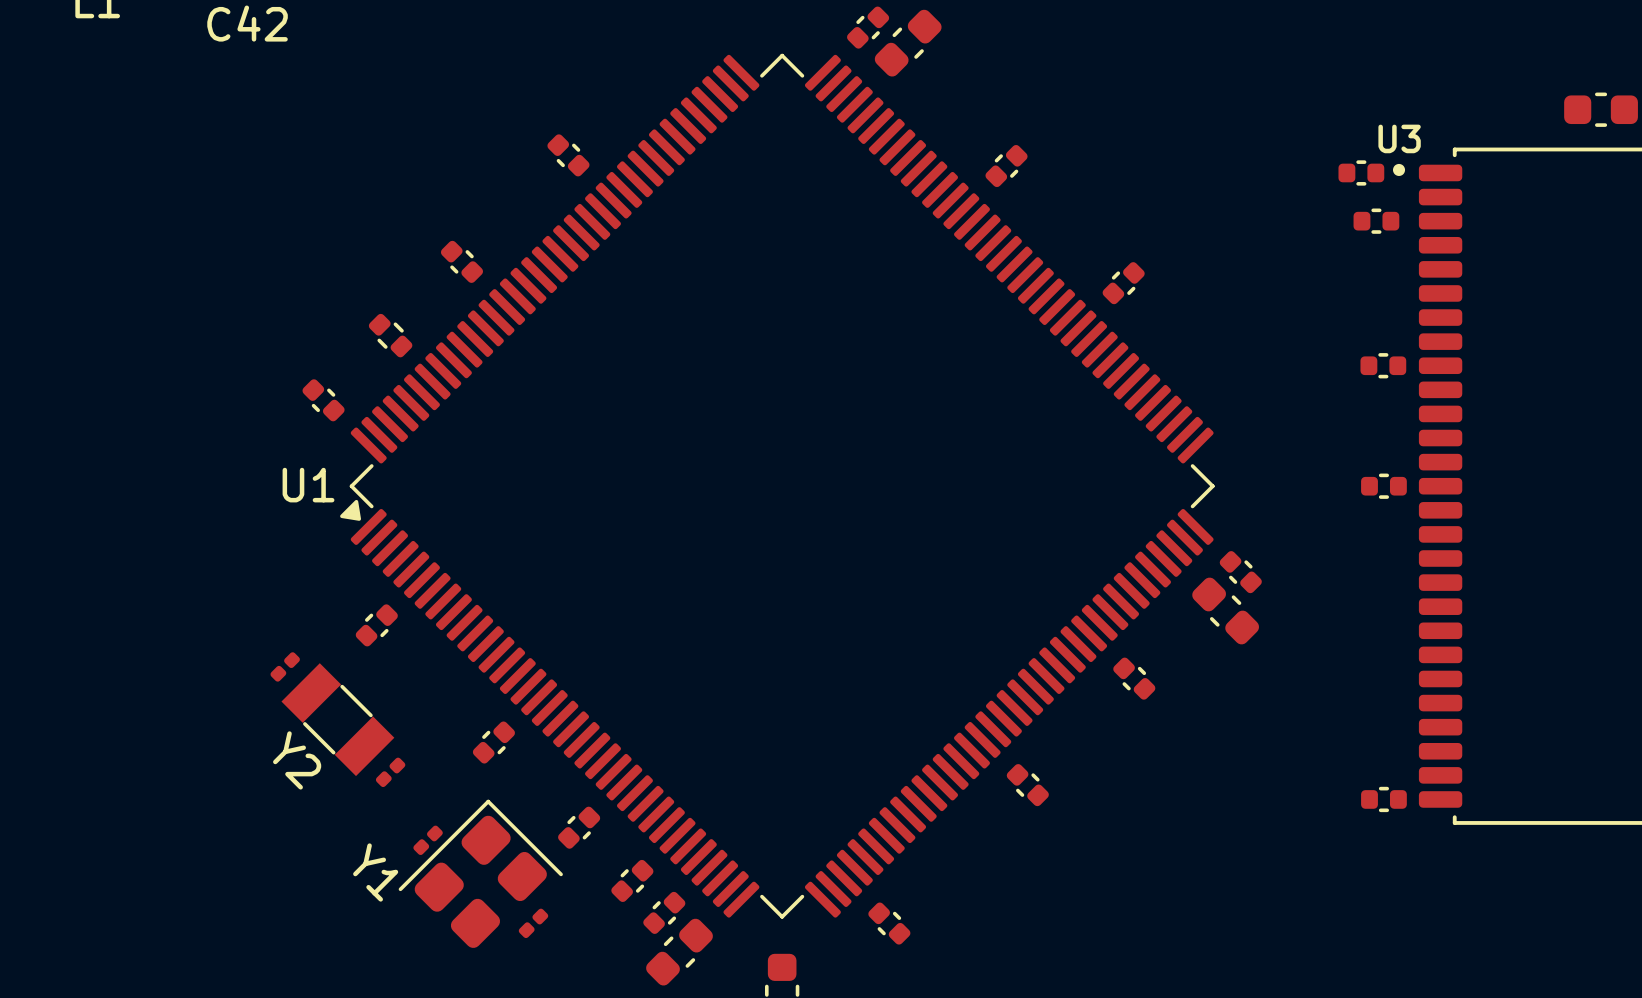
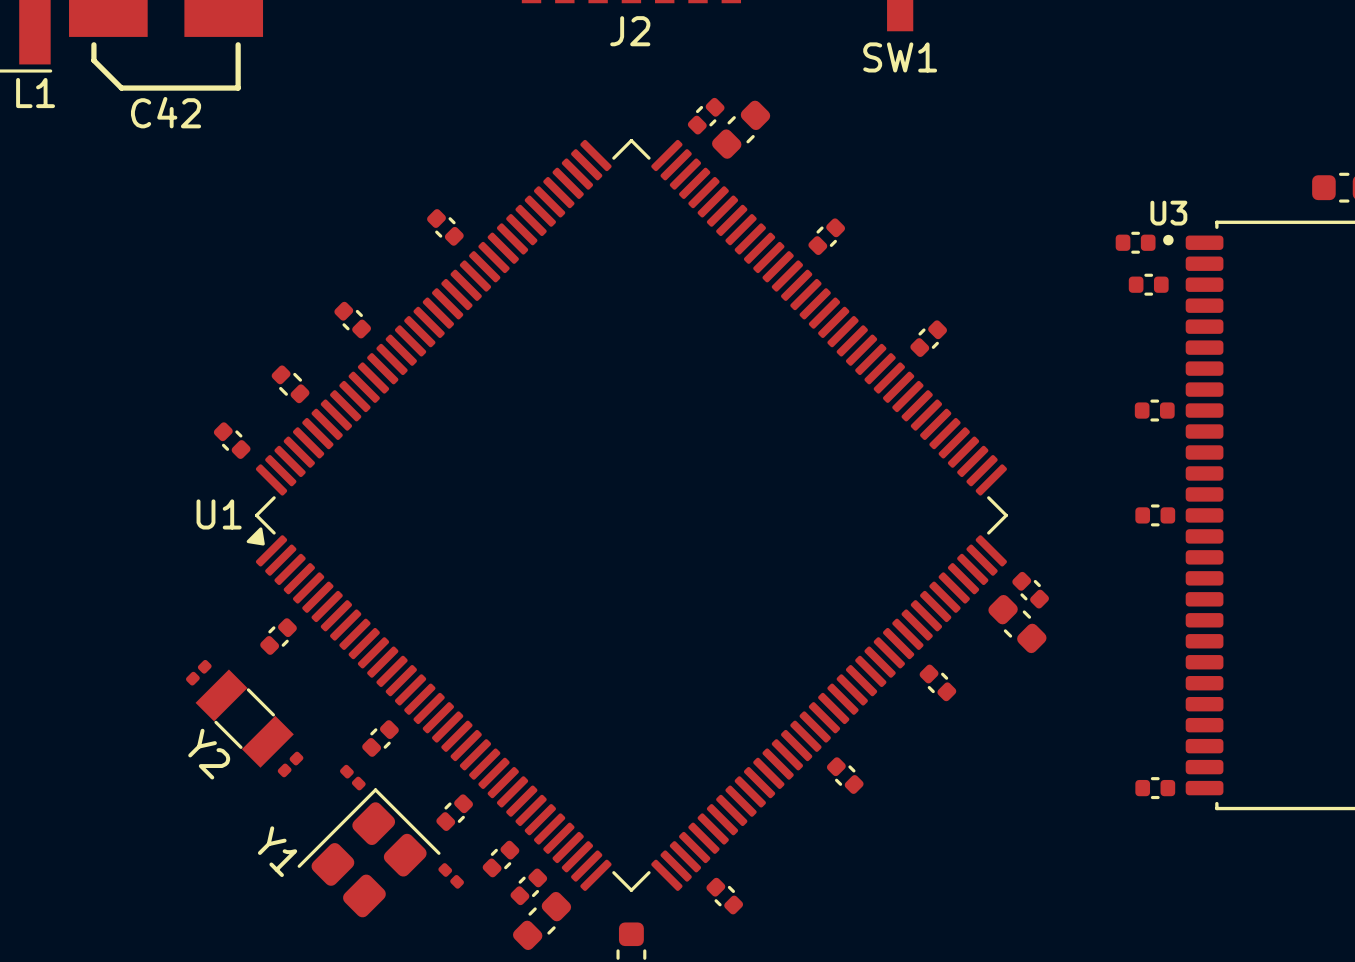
part rotation: 0° (428, 840) -> 90° clockwise (352, 777)
part position: (428, 840) -> (352, 777)
part rotation: 0° (533, 923) -> 90° clockwise (451, 875)
part position: (533, 923) -> (451, 875)

